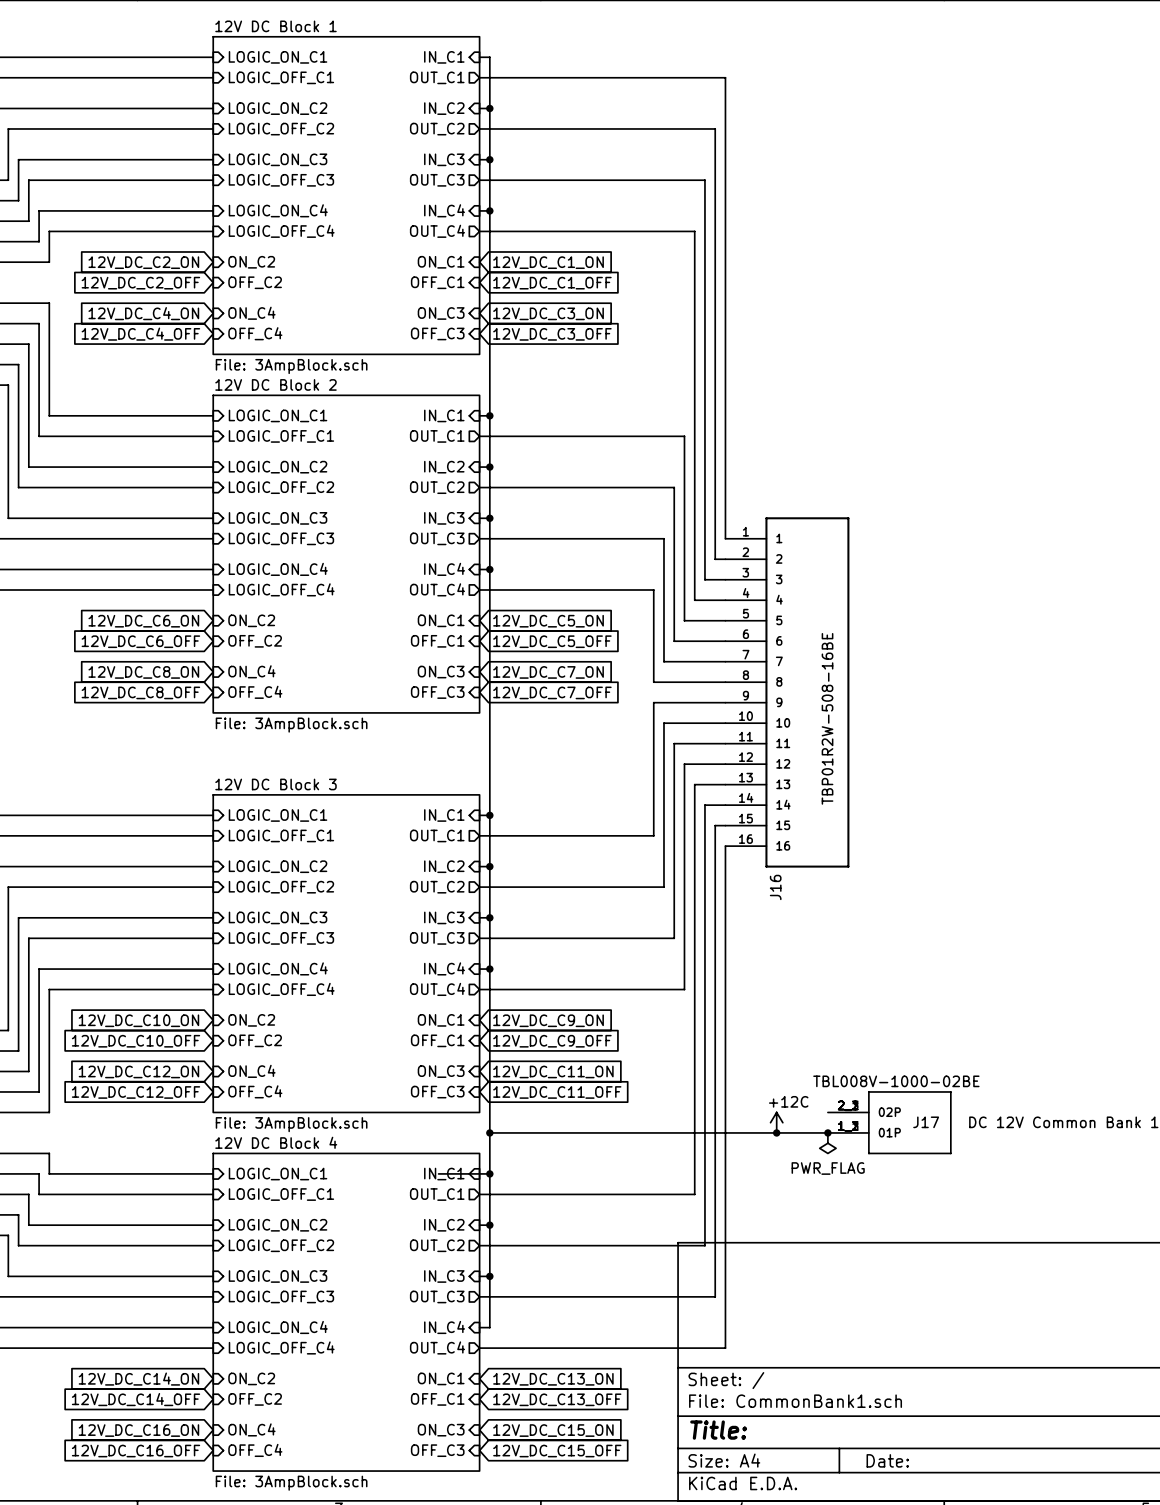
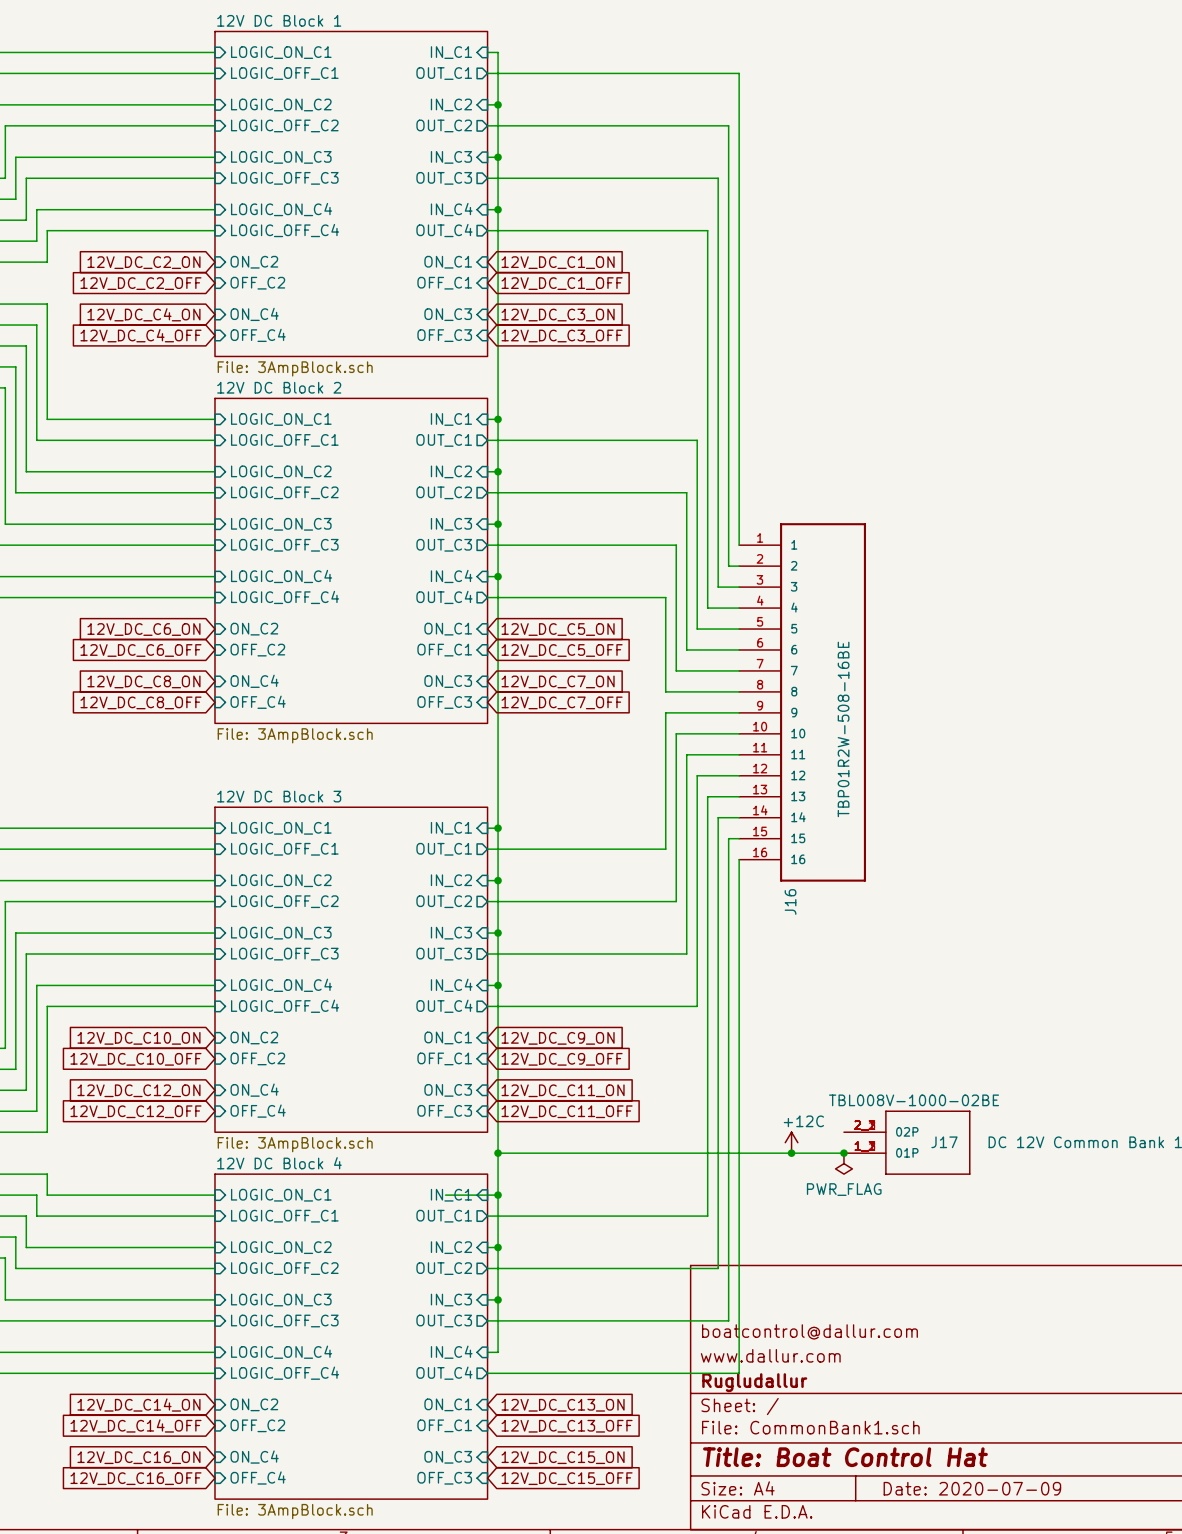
title block: none -> boatcontrol@dallur.com (809, 1331)
title block: none -> www.dallur.com (770, 1355)
title block: none -> Rugludallur (754, 1382)
title block: Title: (718, 1430) -> Title: Boat Control Hat (845, 1457)
title block: Date: (887, 1460) -> Date: 2020-07-09 (972, 1488)

